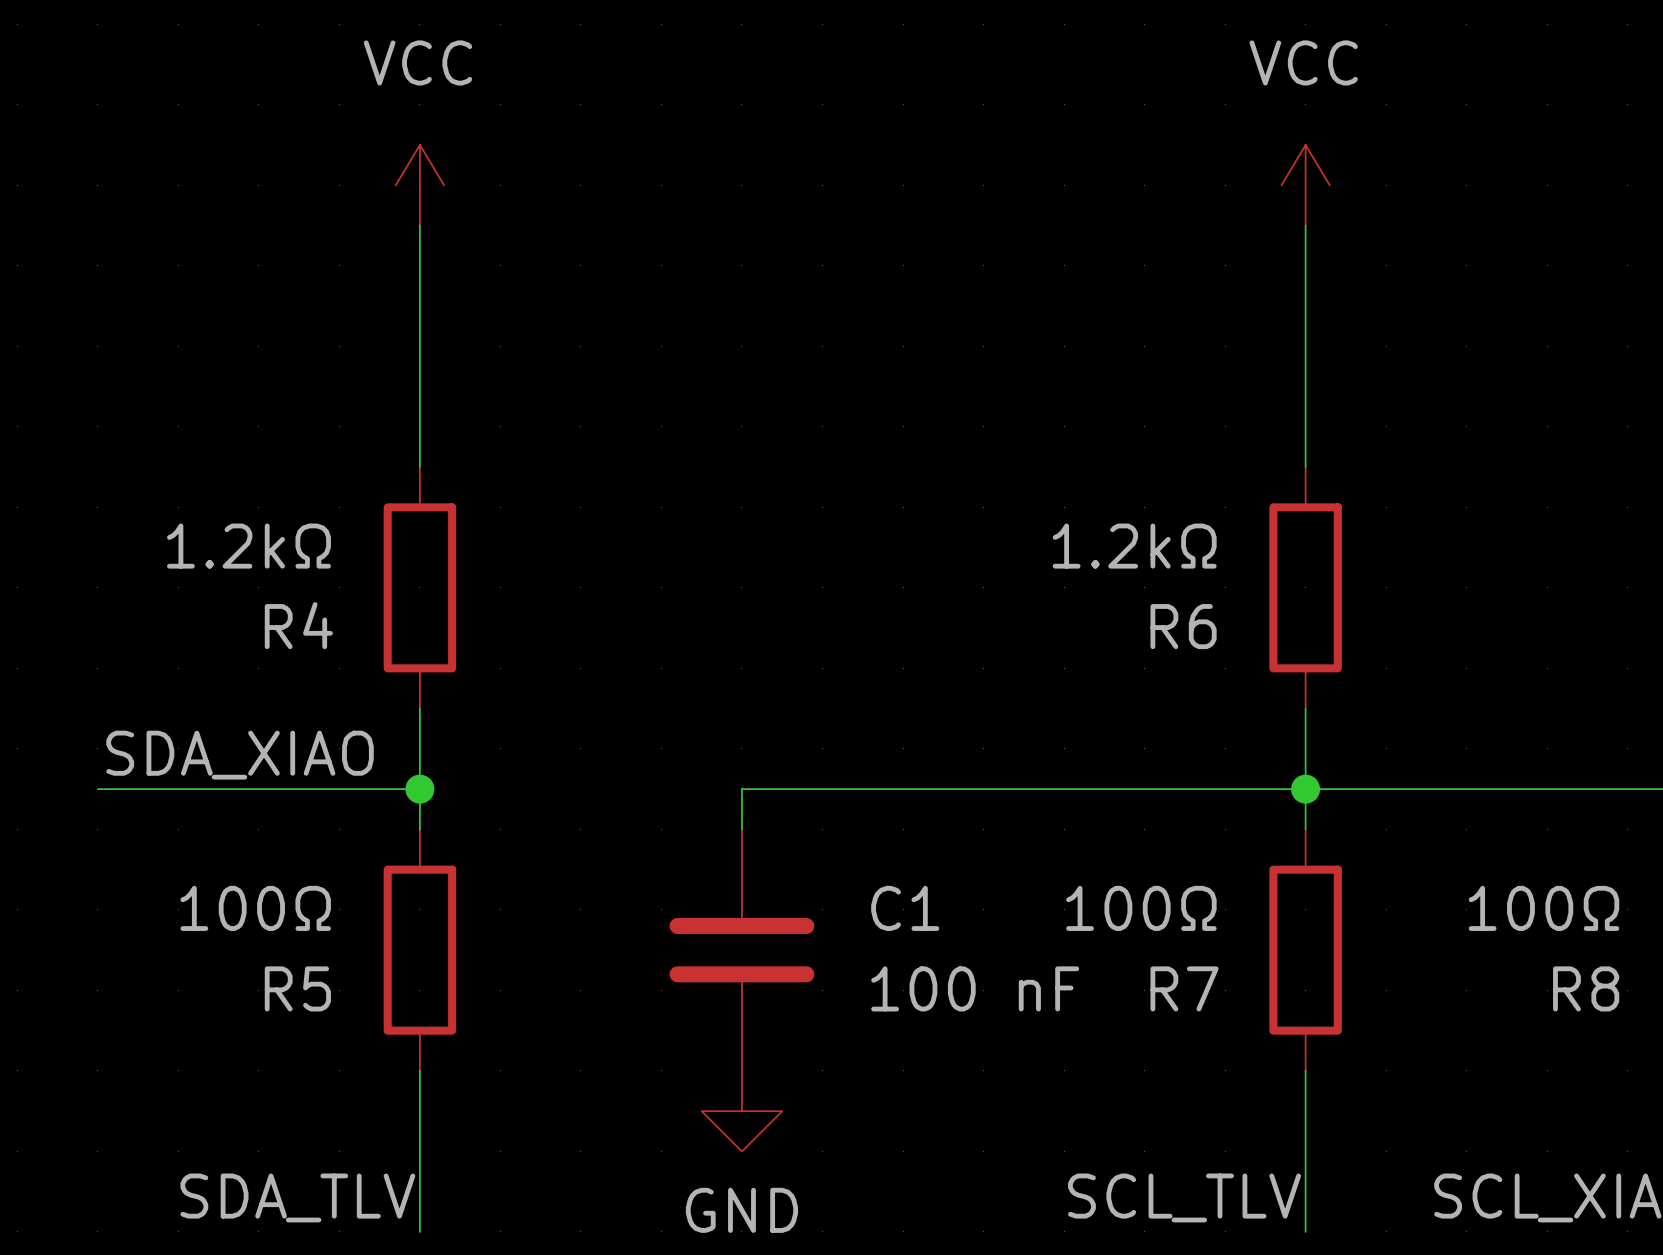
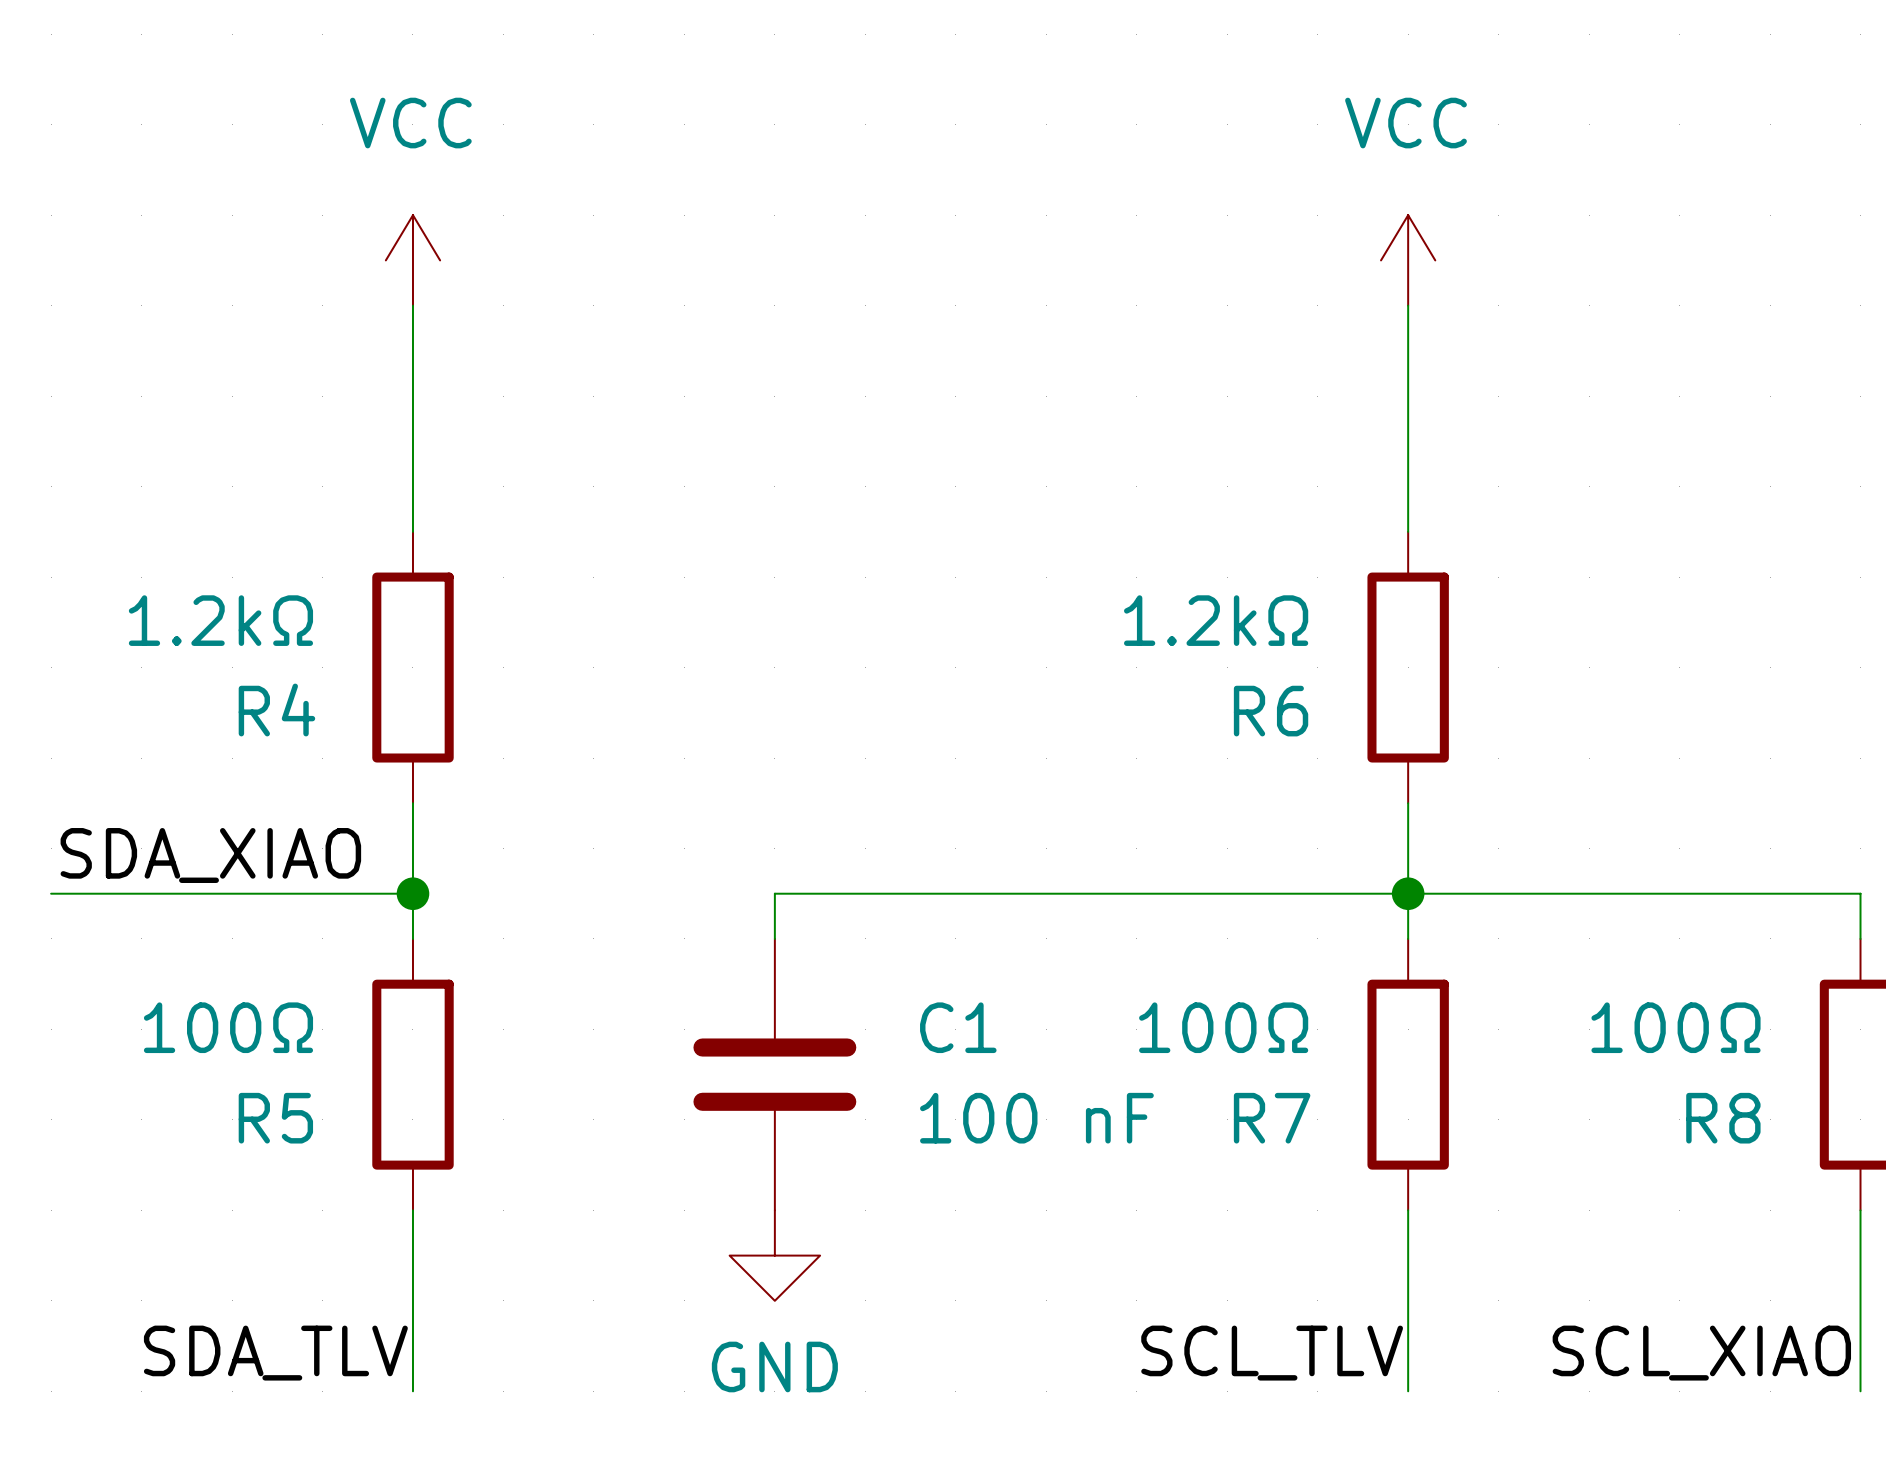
power symbol position: VCC (419, 185) -> VCC (412, 260)
power symbol position: VCC (1305, 185) -> VCC (1408, 260)

